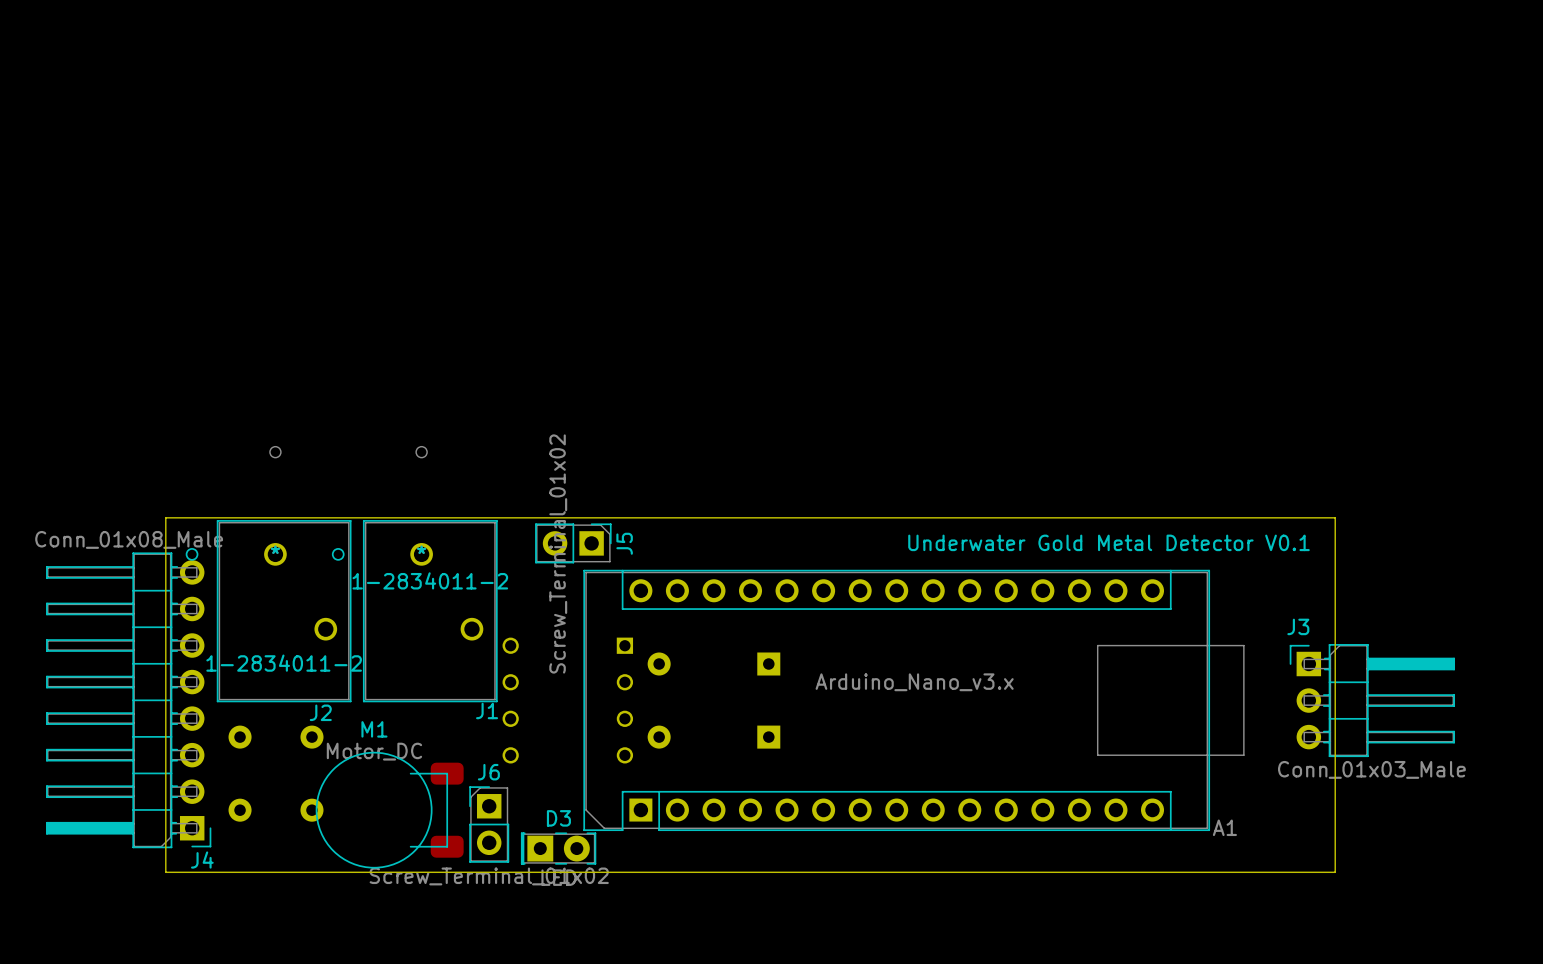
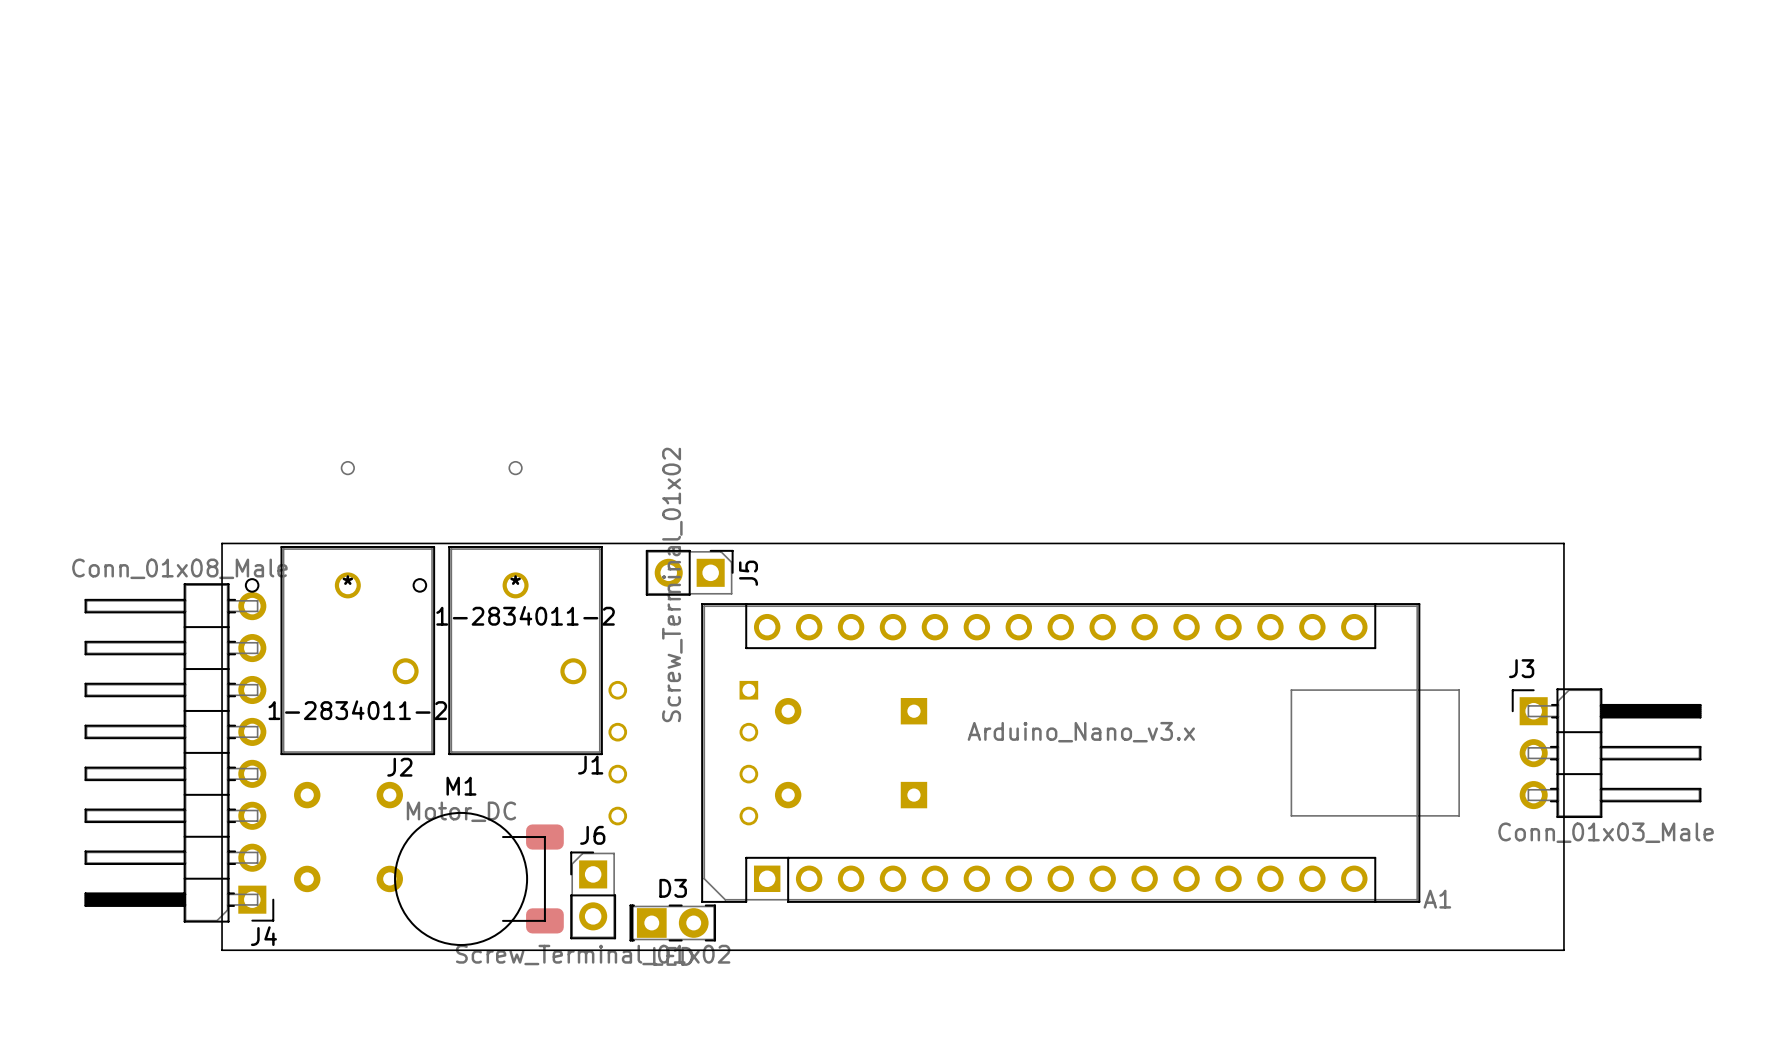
text: Underwater Gold Metal Detector V0.1 (1108, 542) -> none

